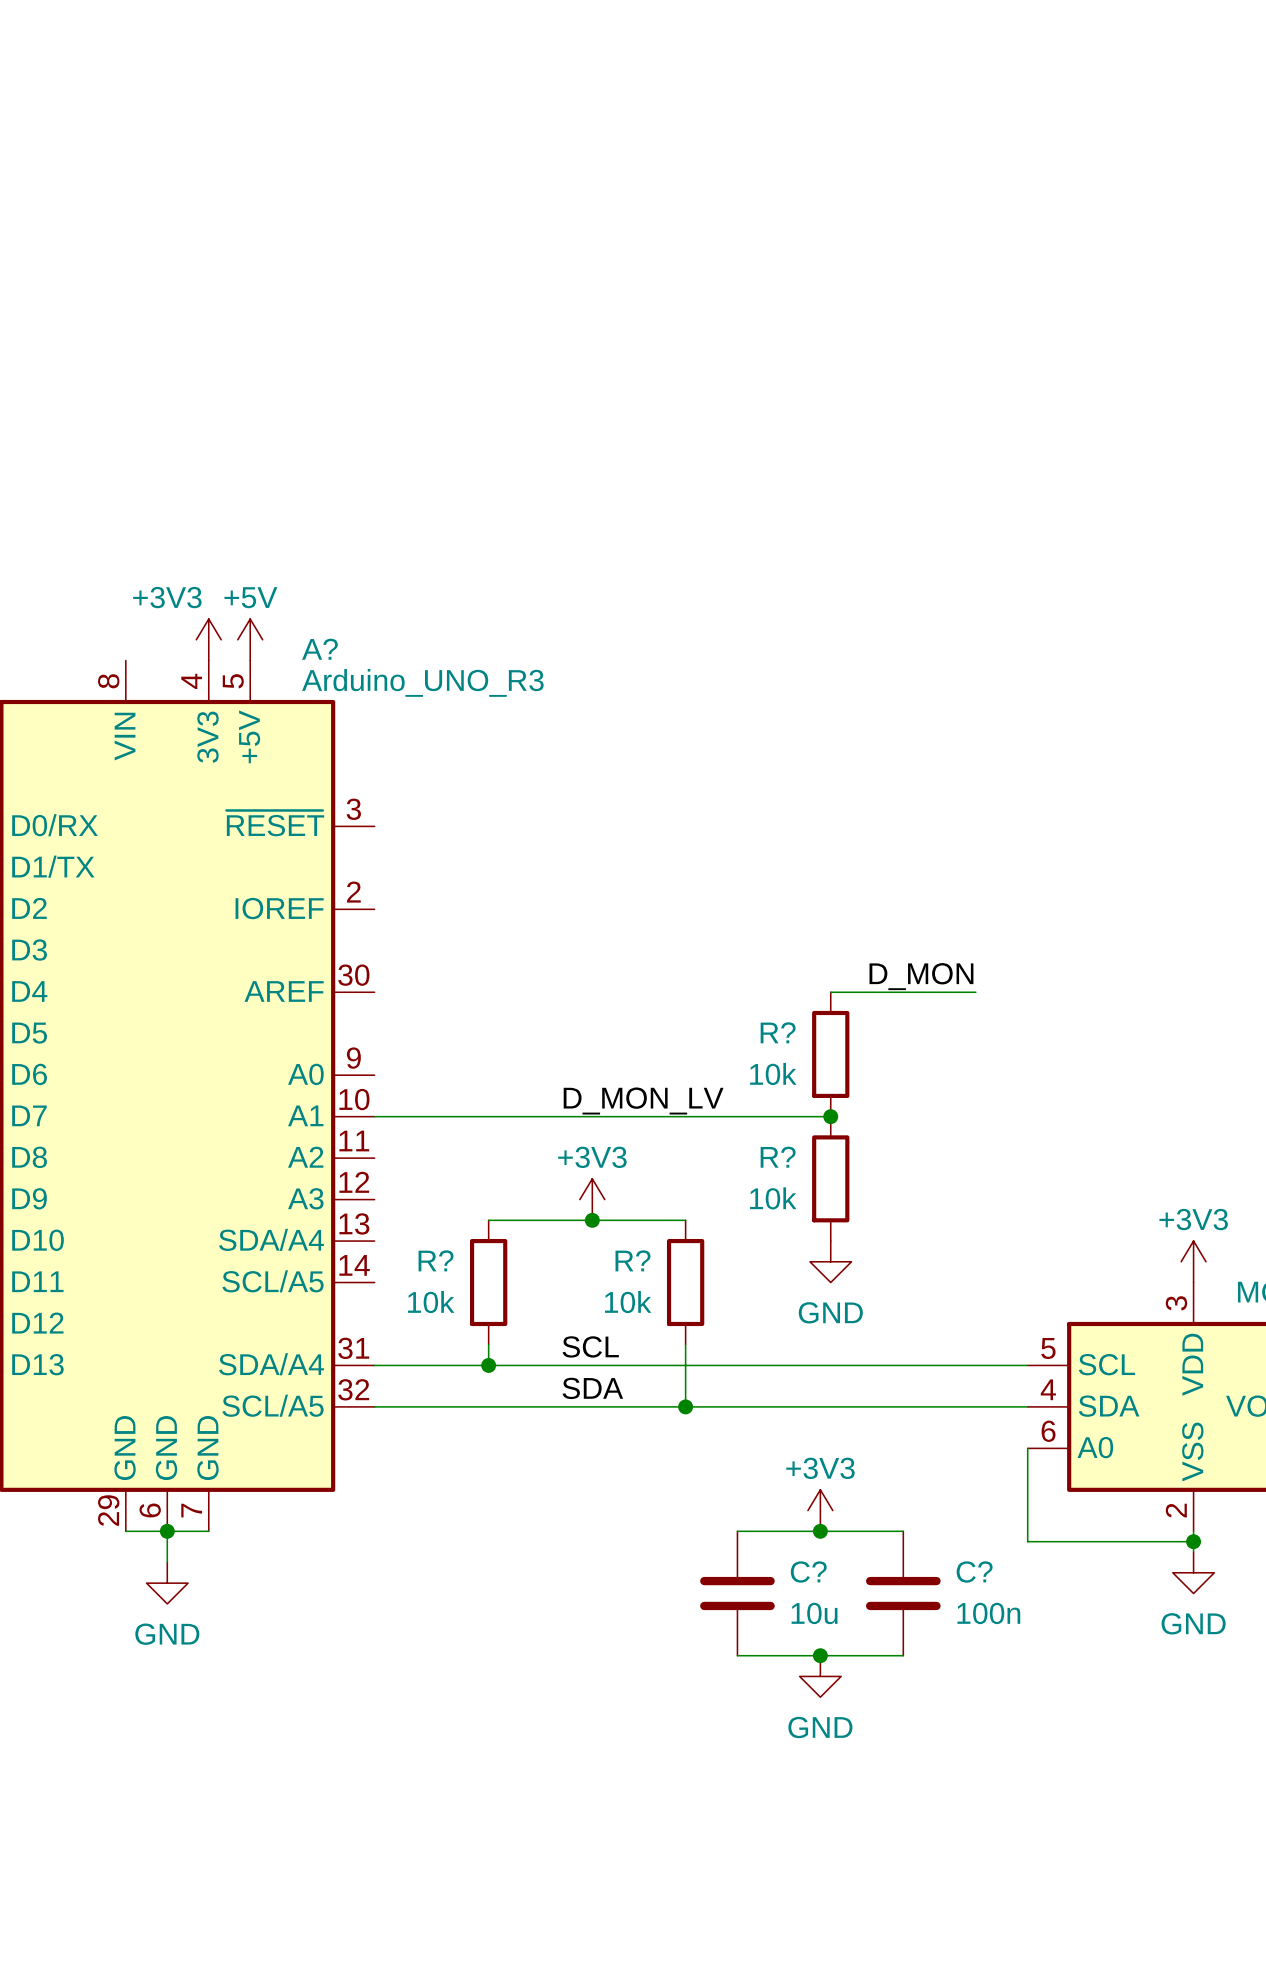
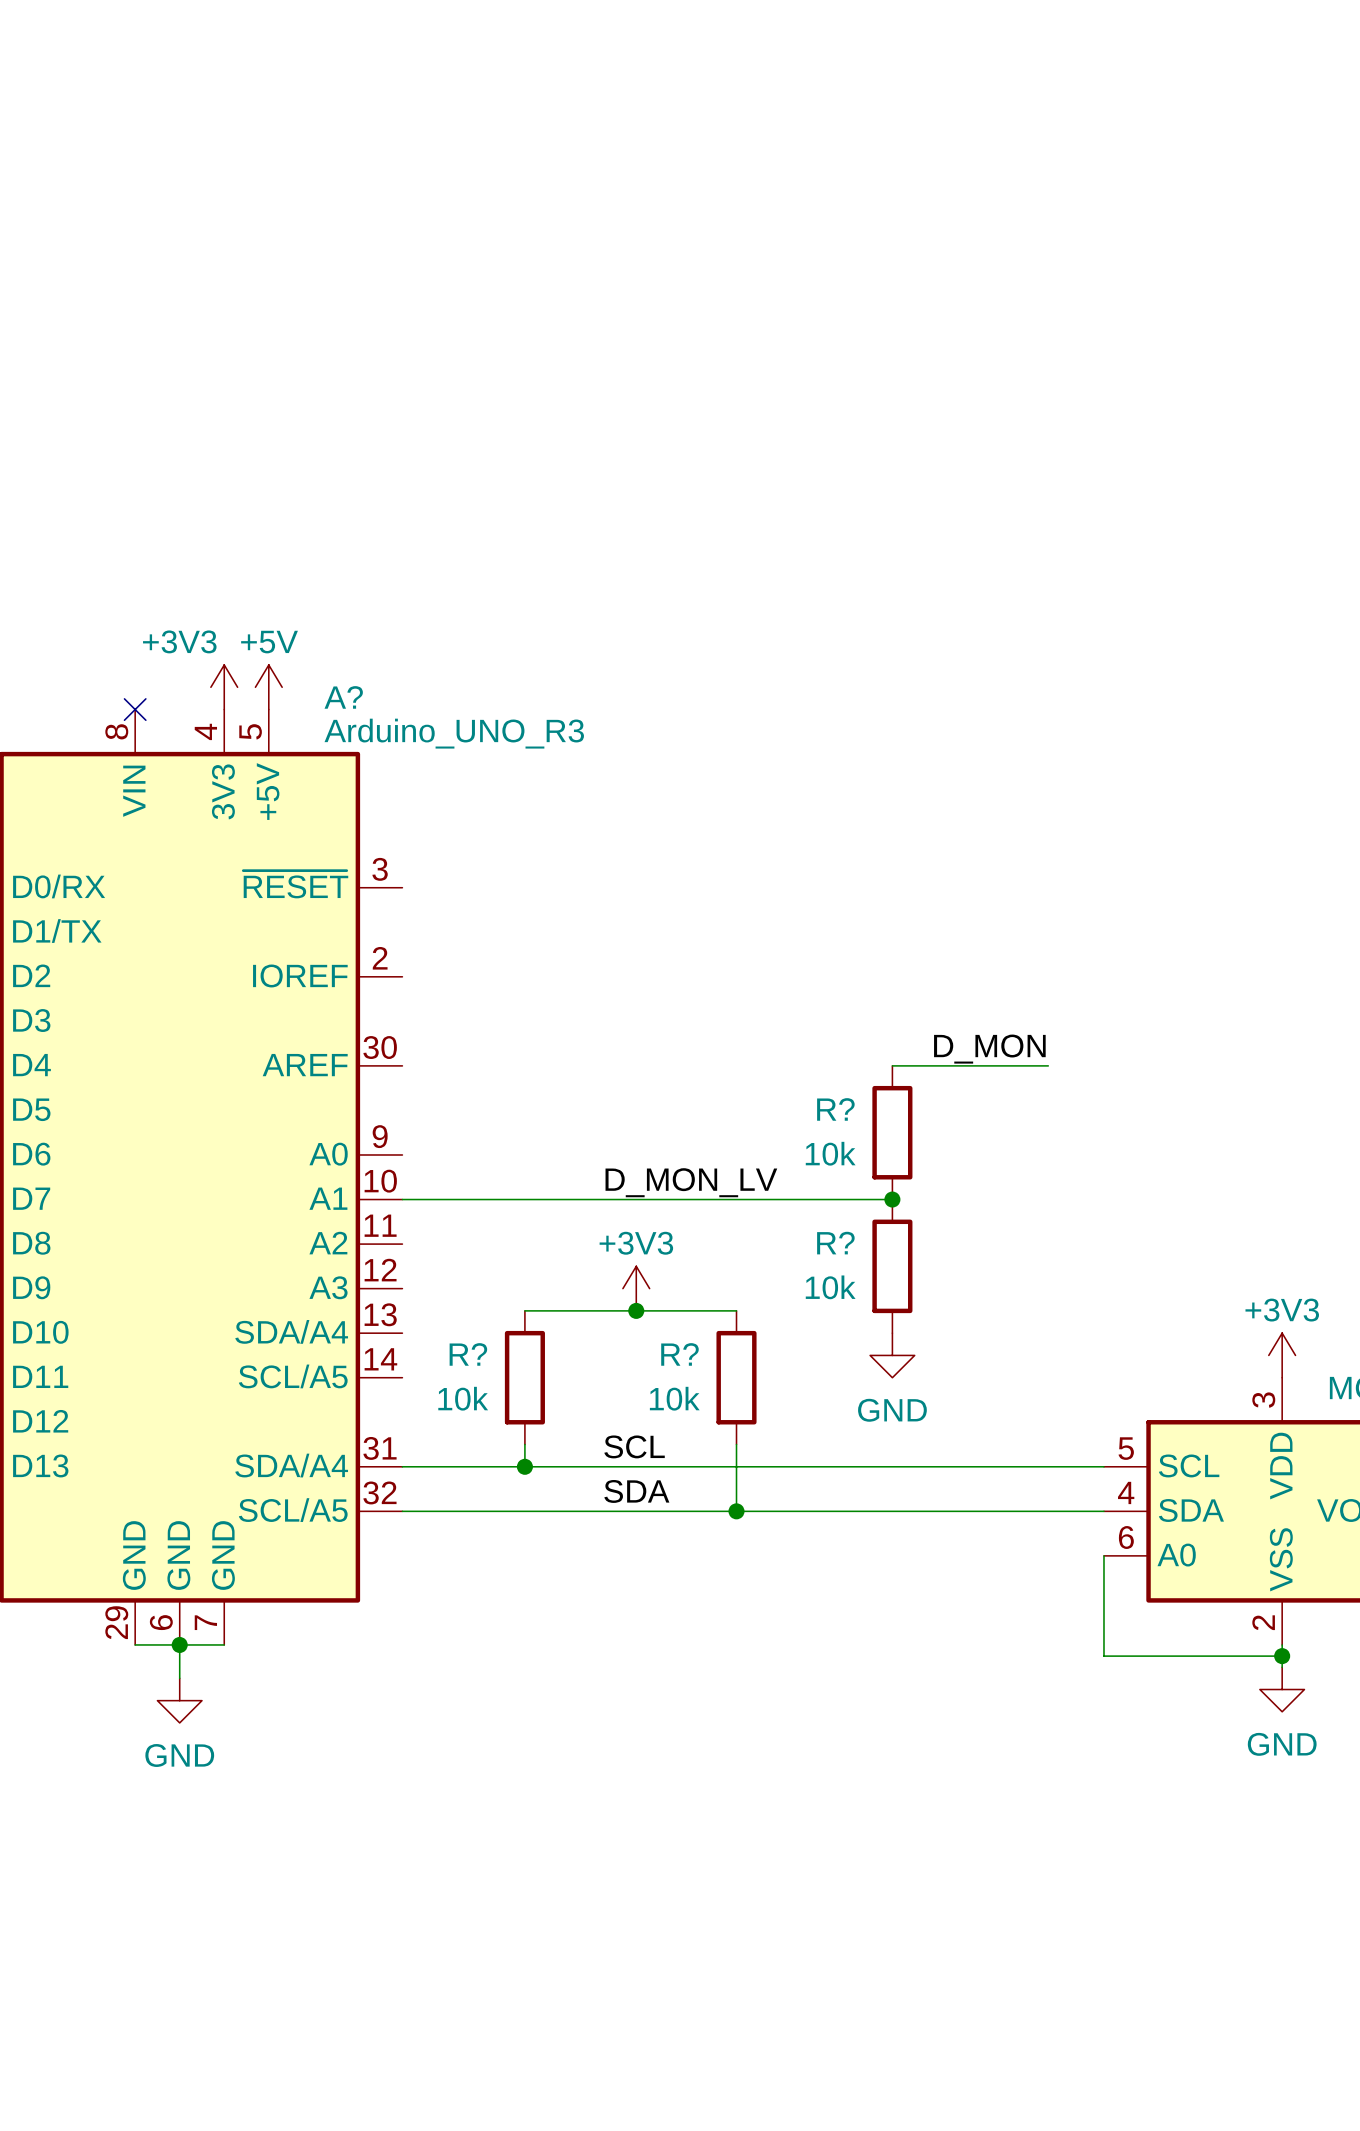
no-connect mark: none -> (135, 709)
power symbol: +3V3 (820, 1510) -> none
wire: (737, 1531) (903, 1531) -> none
junction: (820, 1531) -> none
C?: 10u (737, 1593) -> none
C?: 100n (903, 1593) -> none
wire: (737, 1655) (903, 1655) -> none
junction: (820, 1655) -> none
power symbol: GND (820, 1676) -> none

